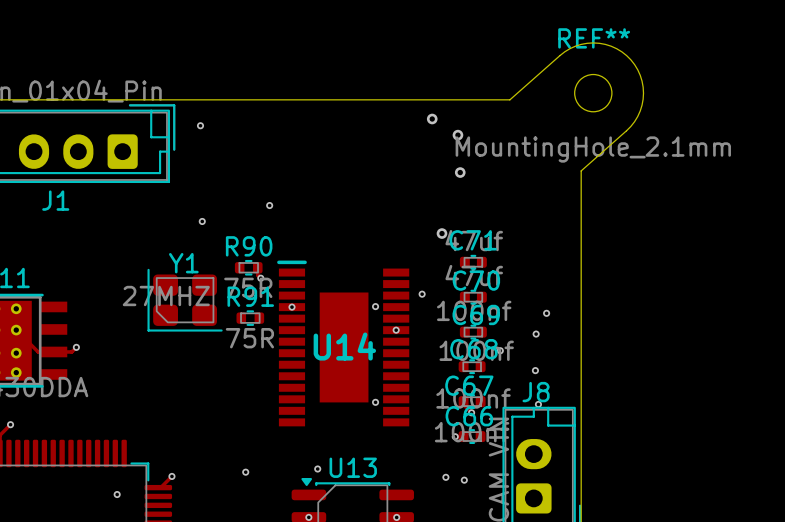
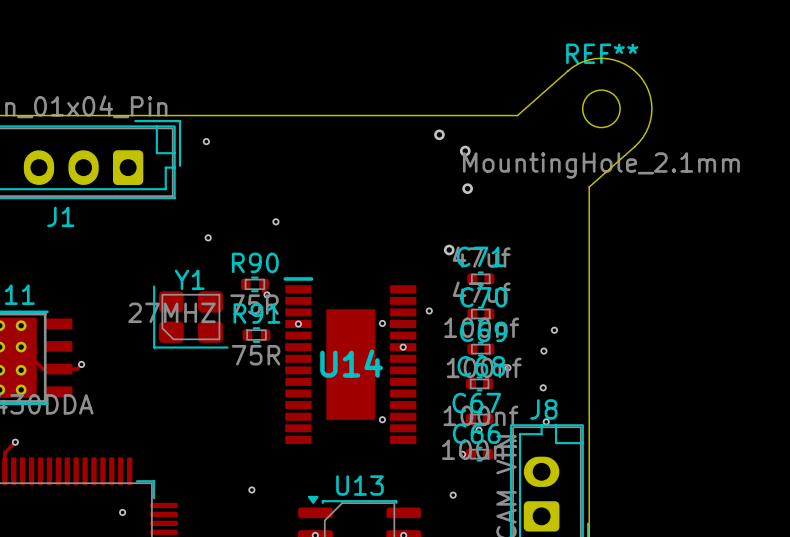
via: (317, 469) -> none
track: (171, 476) (160, 487) (158, 487) -> none
via: (171, 476) -> none
via: (464, 480) -> none

